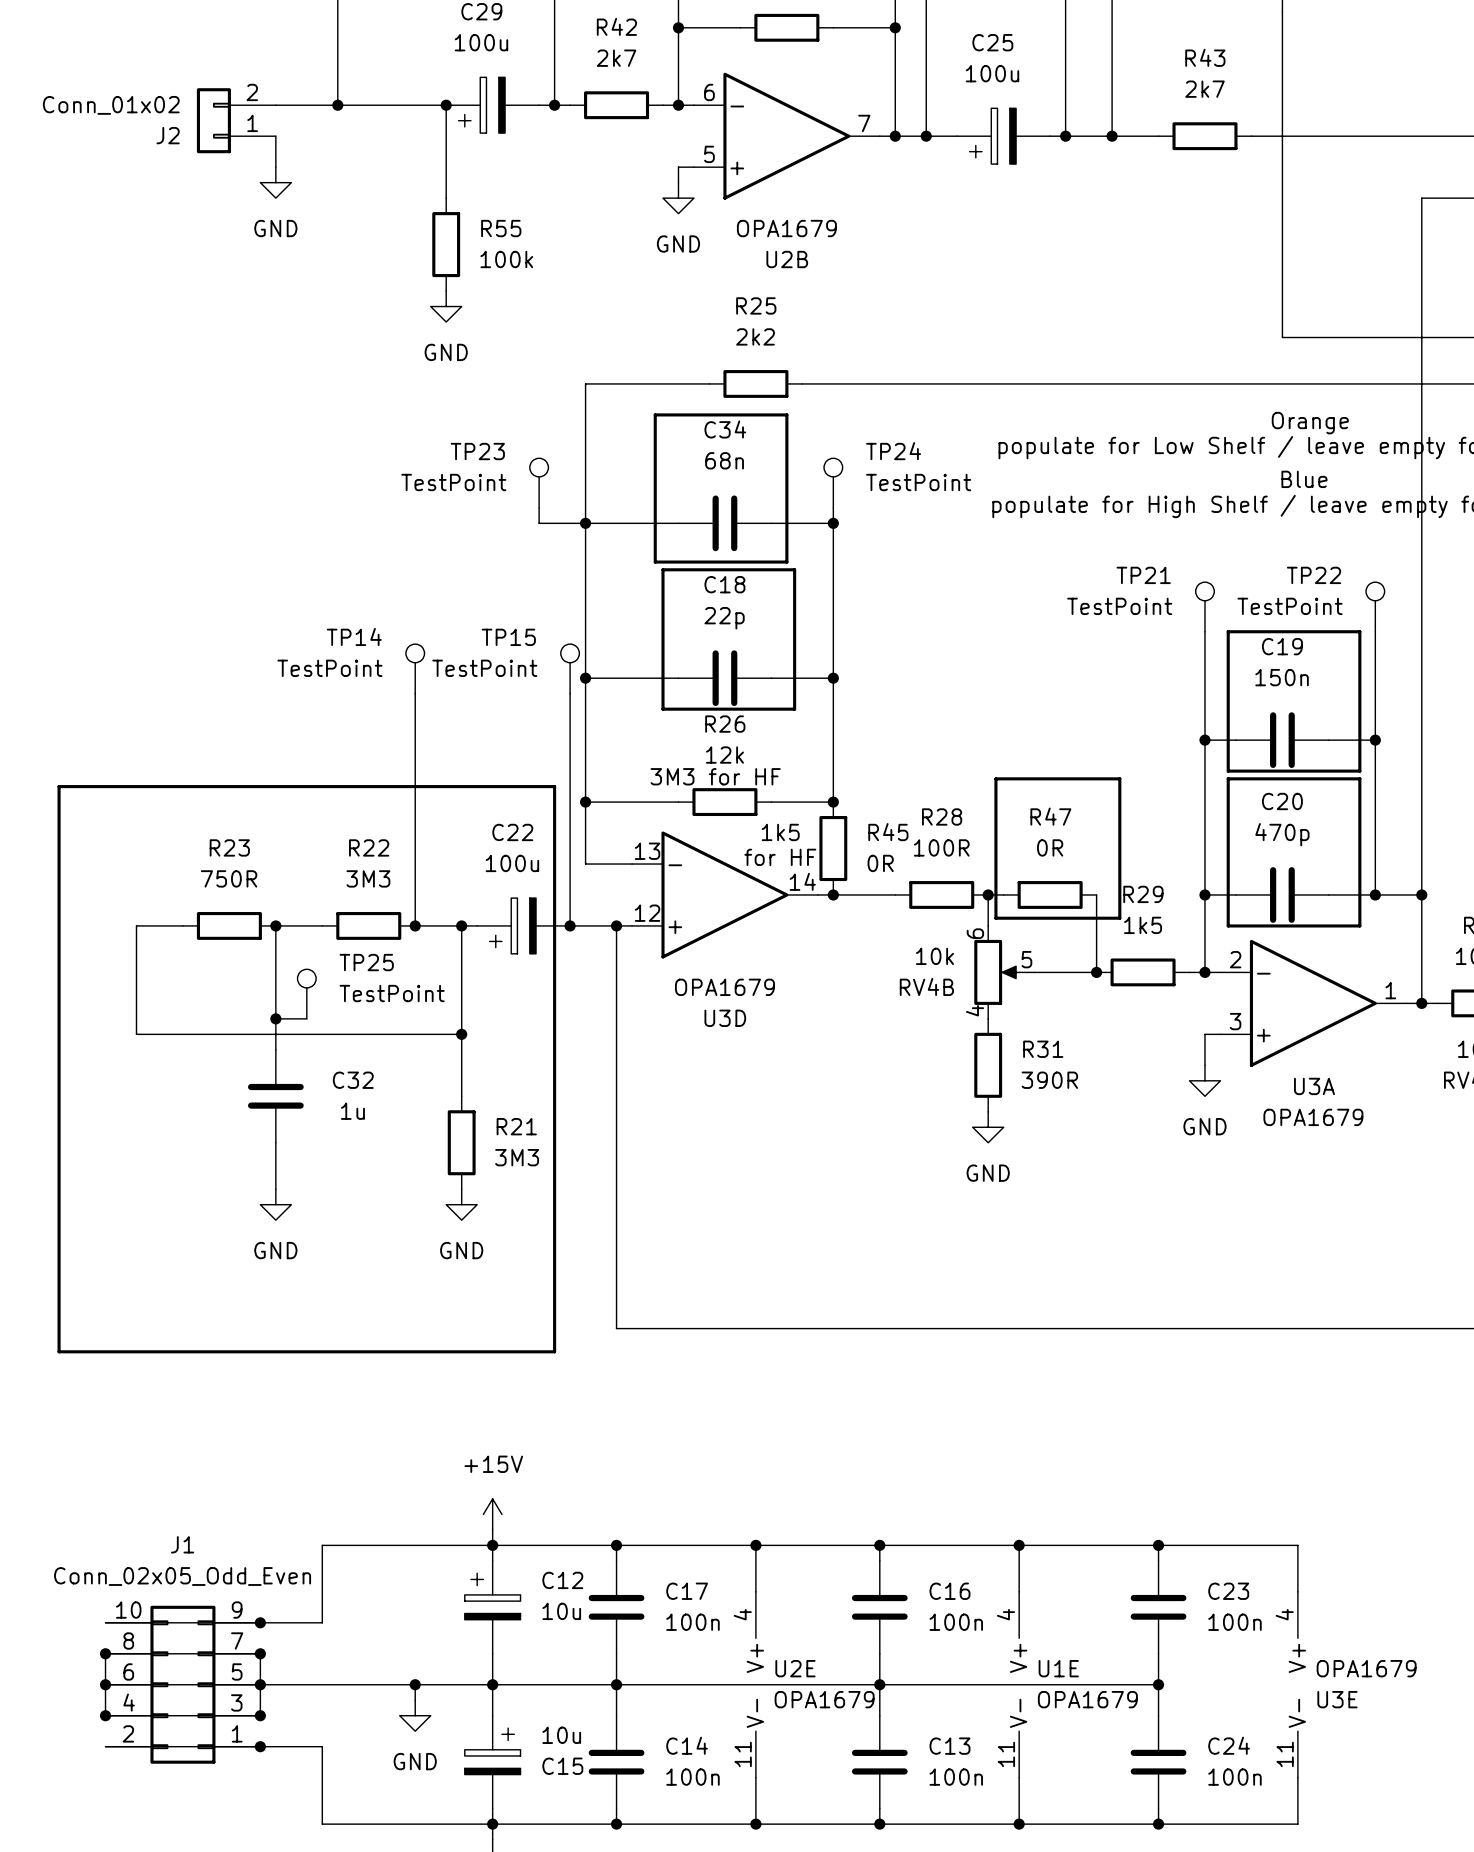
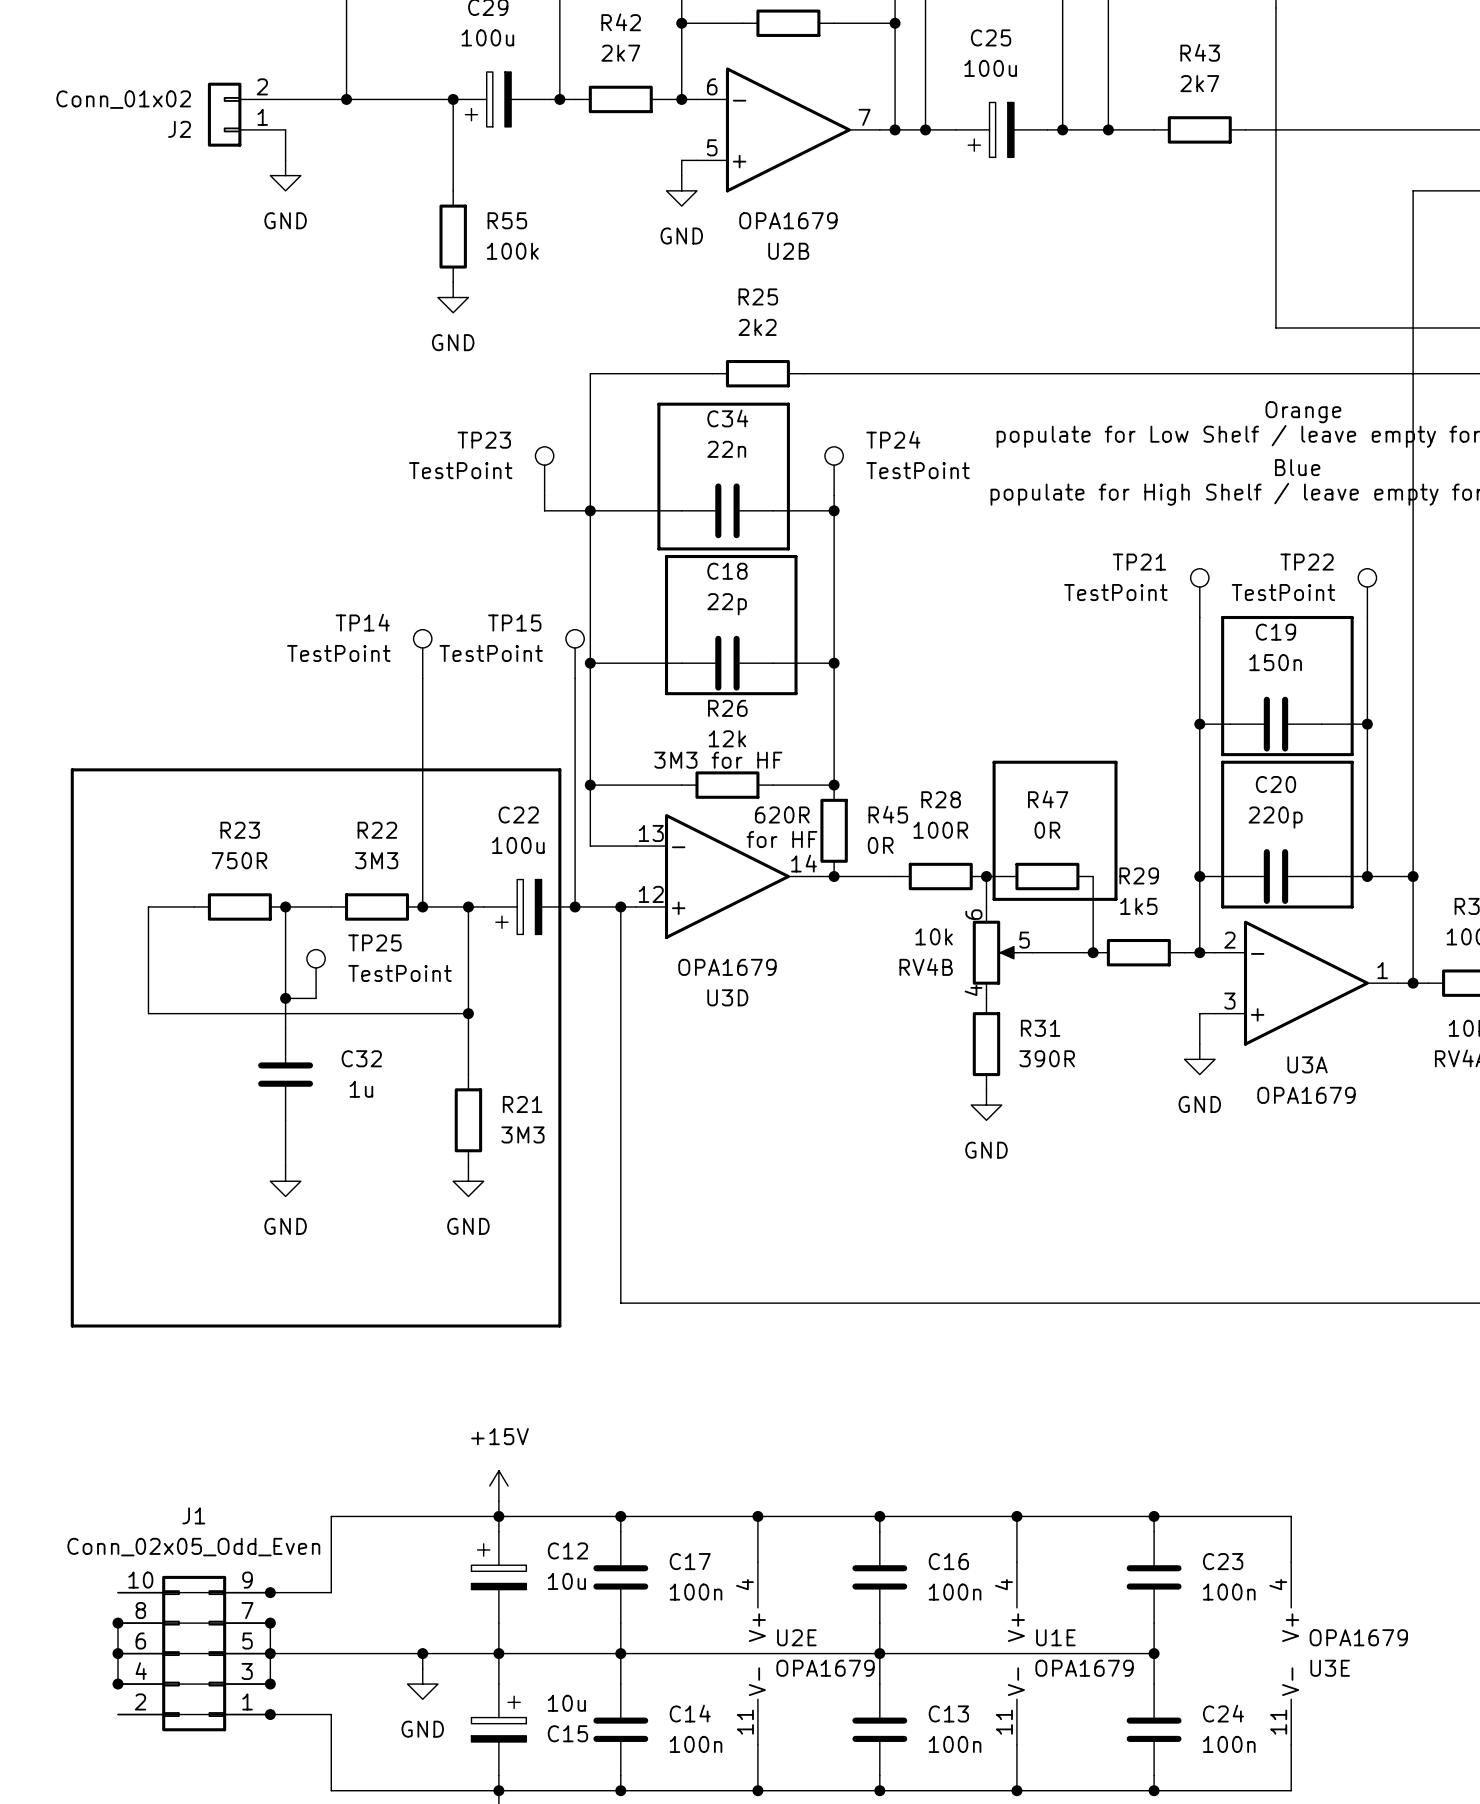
C34 value: 68n (724, 460) -> 22n (726, 449)
text: 1k5 (780, 832) -> 620R (782, 814)
C20 value: 470p (1282, 834) -> 220p (1275, 817)

